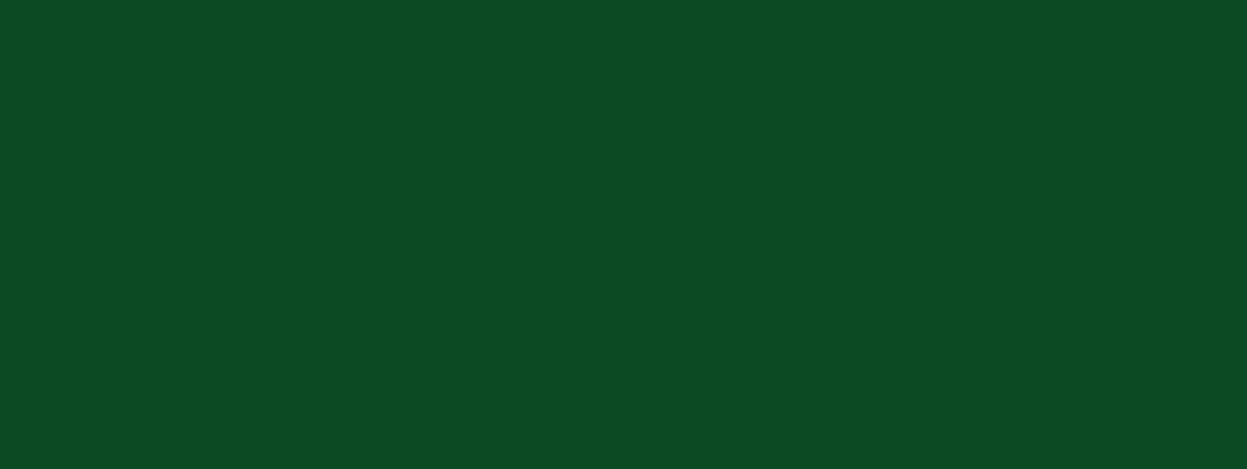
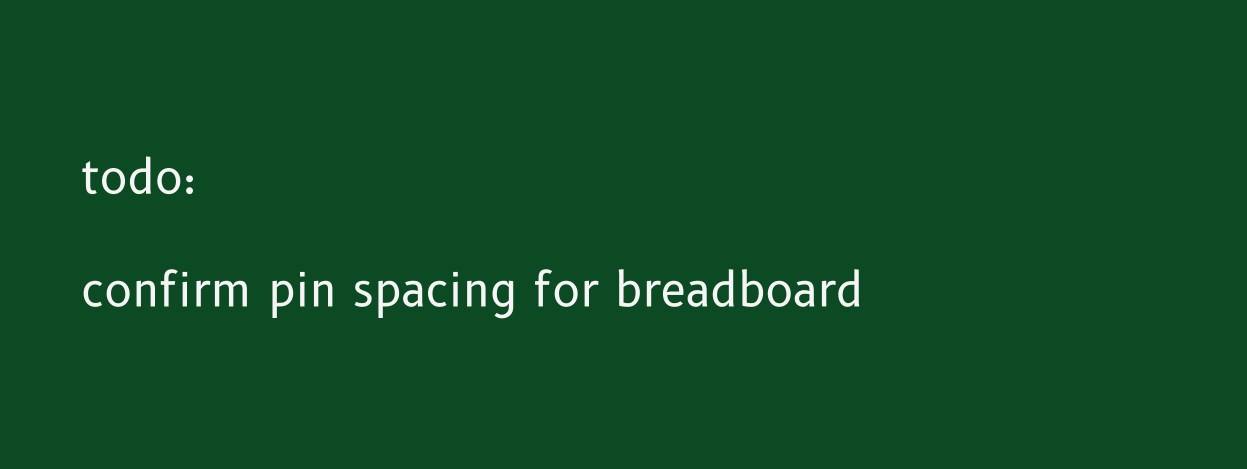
text: none -> todo: (137, 175)
text: none -> confirm pin spacing for breadboard (471, 293)

